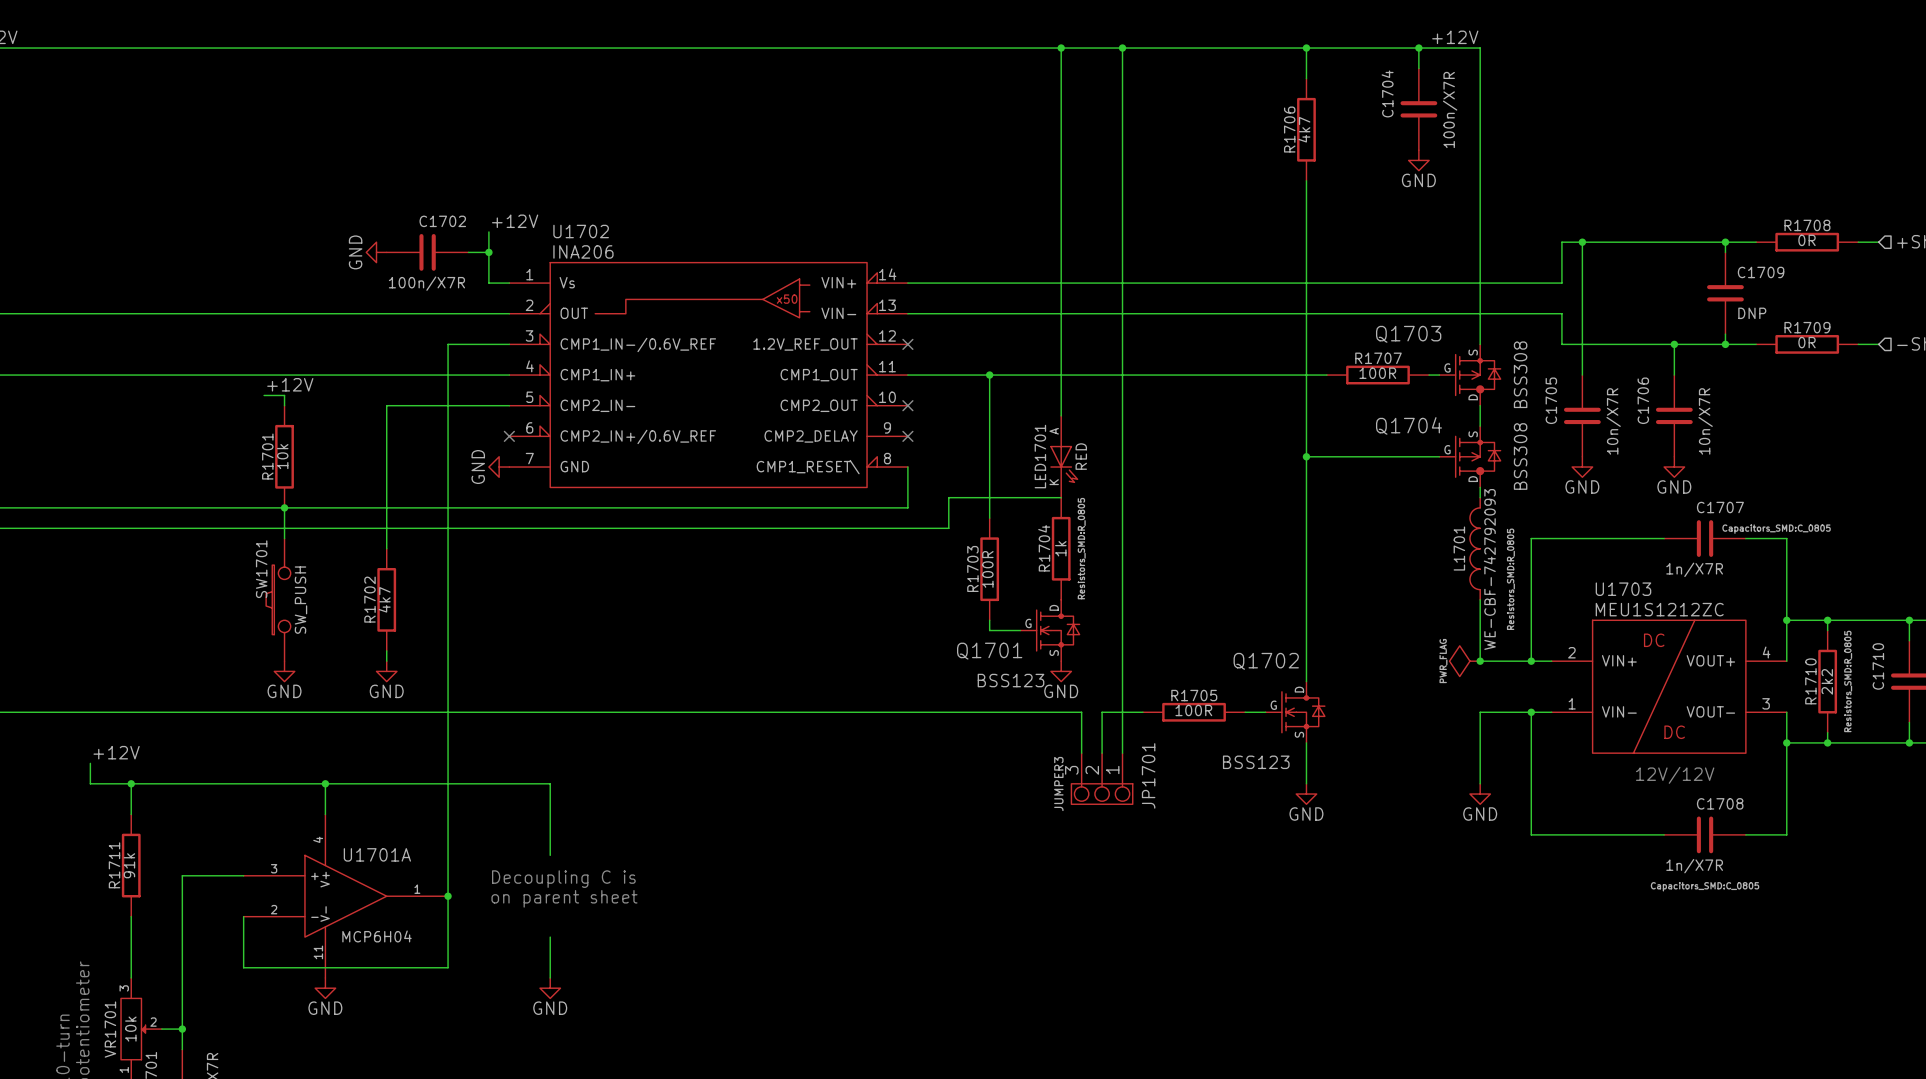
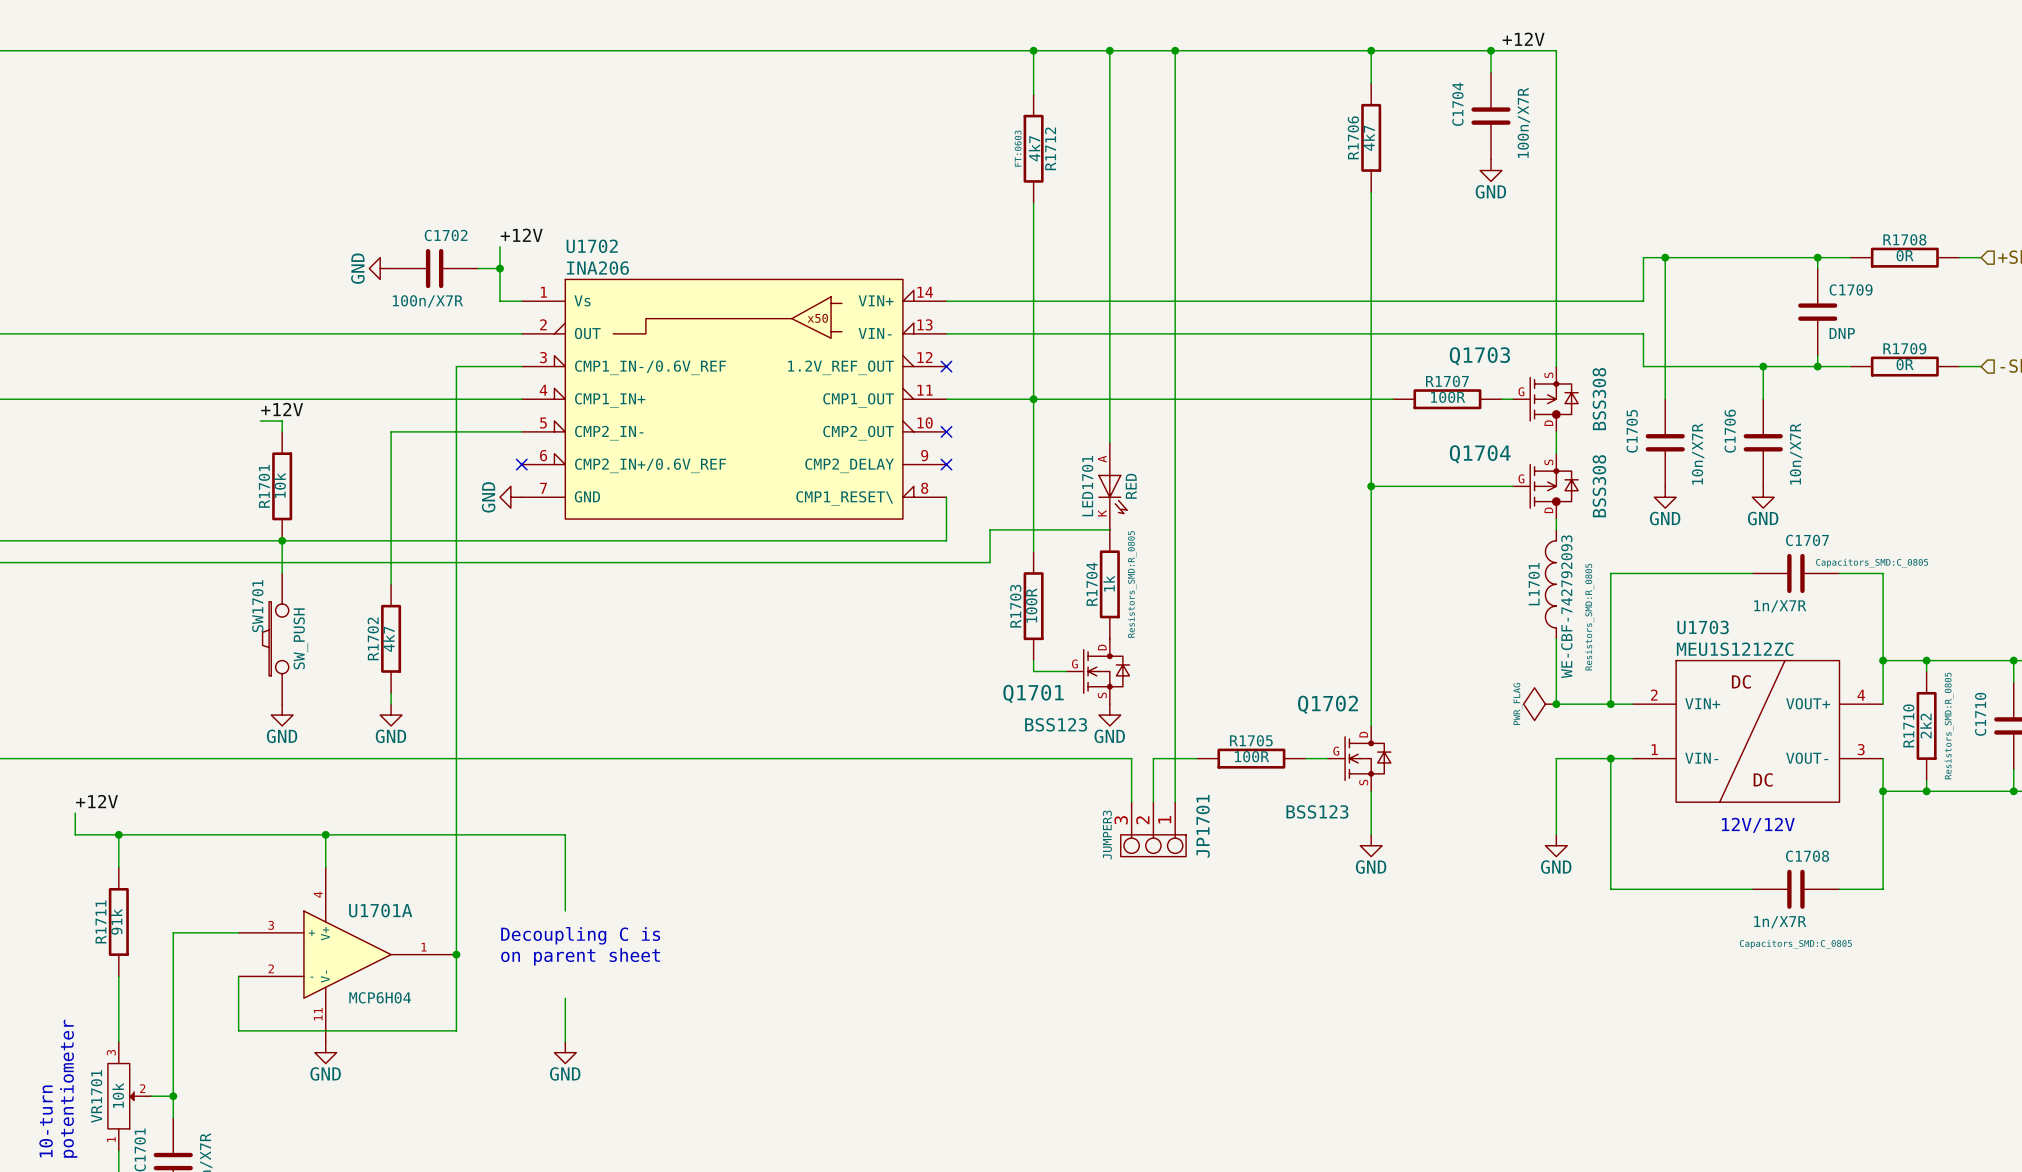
wire: none -> (1033, 50) (1033, 94)
junction: none -> (1033, 50)
R1712: none -> 4k7 (1033, 148)
wire: none -> (1033, 203) (1033, 399)

